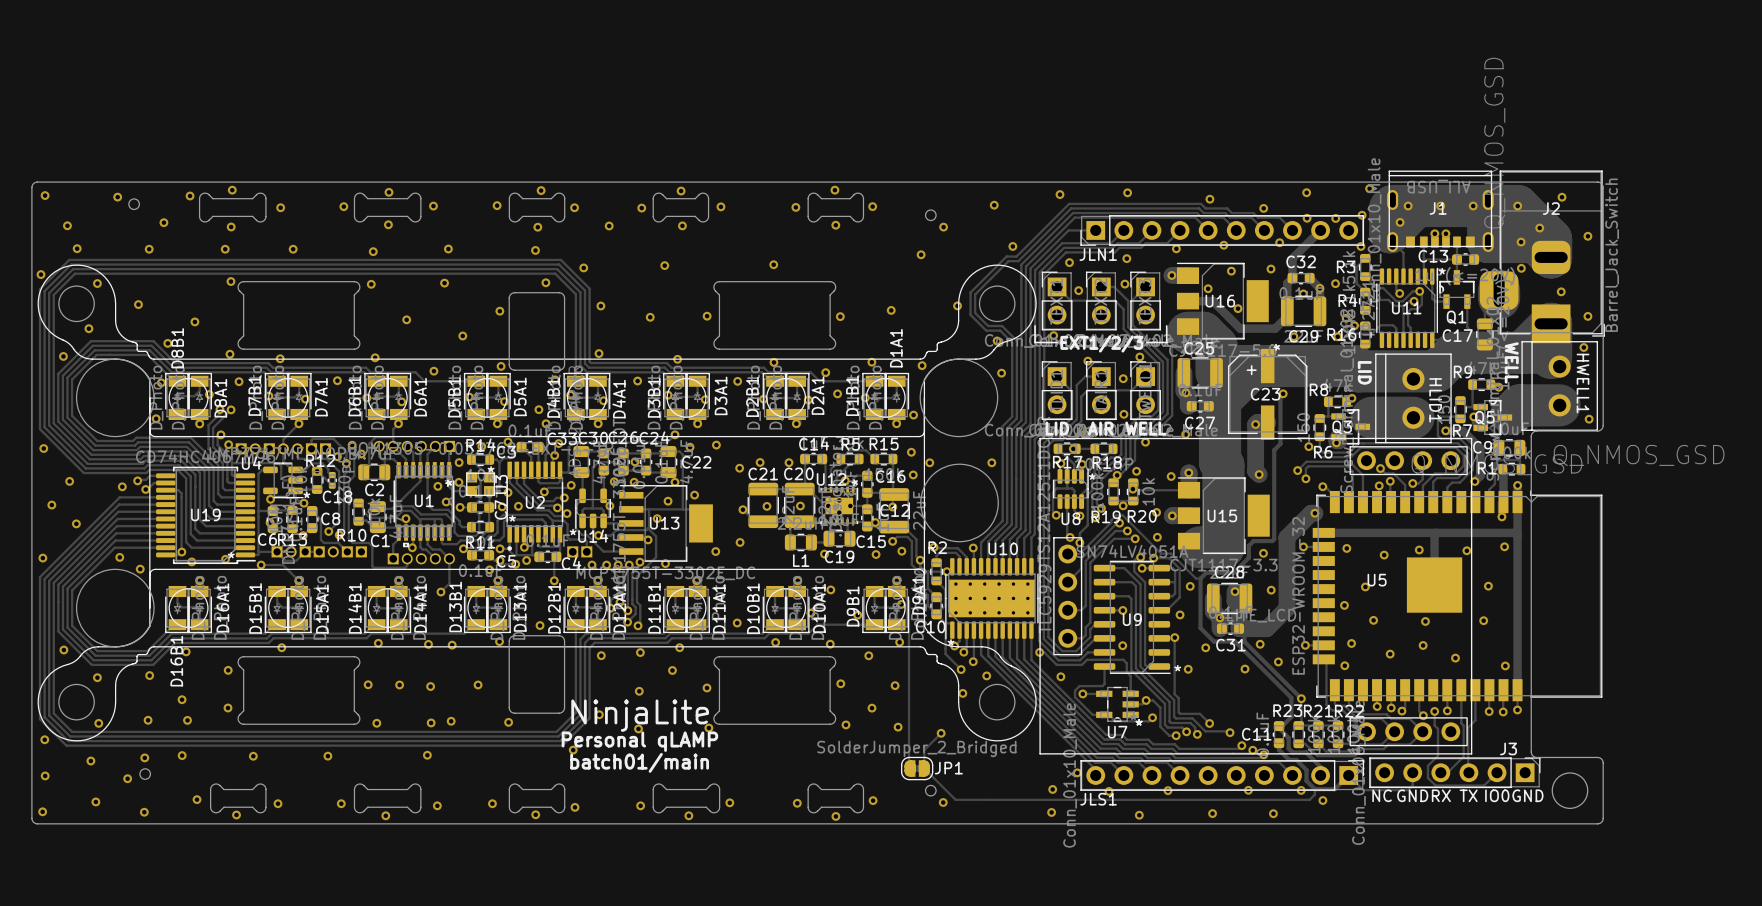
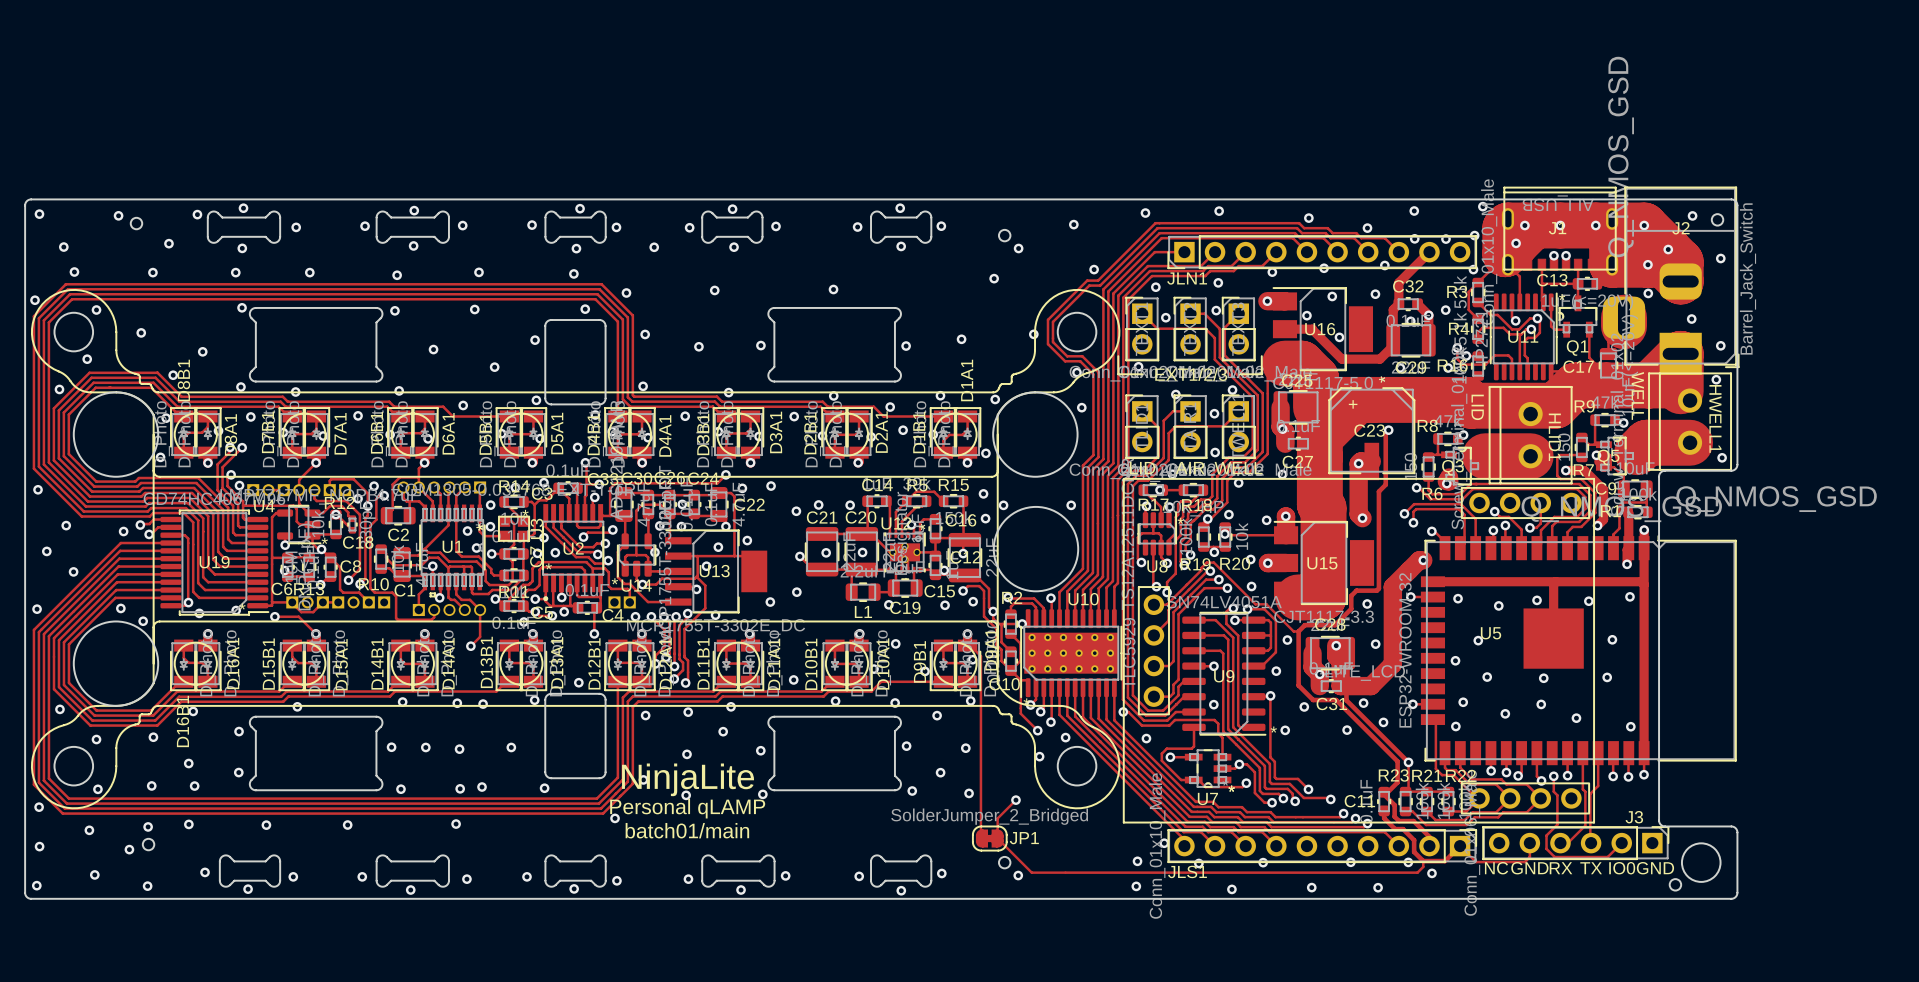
round board edge: none -> [1711, 213, 1724, 227]
round board edge: none -> [1669, 878, 1682, 892]

